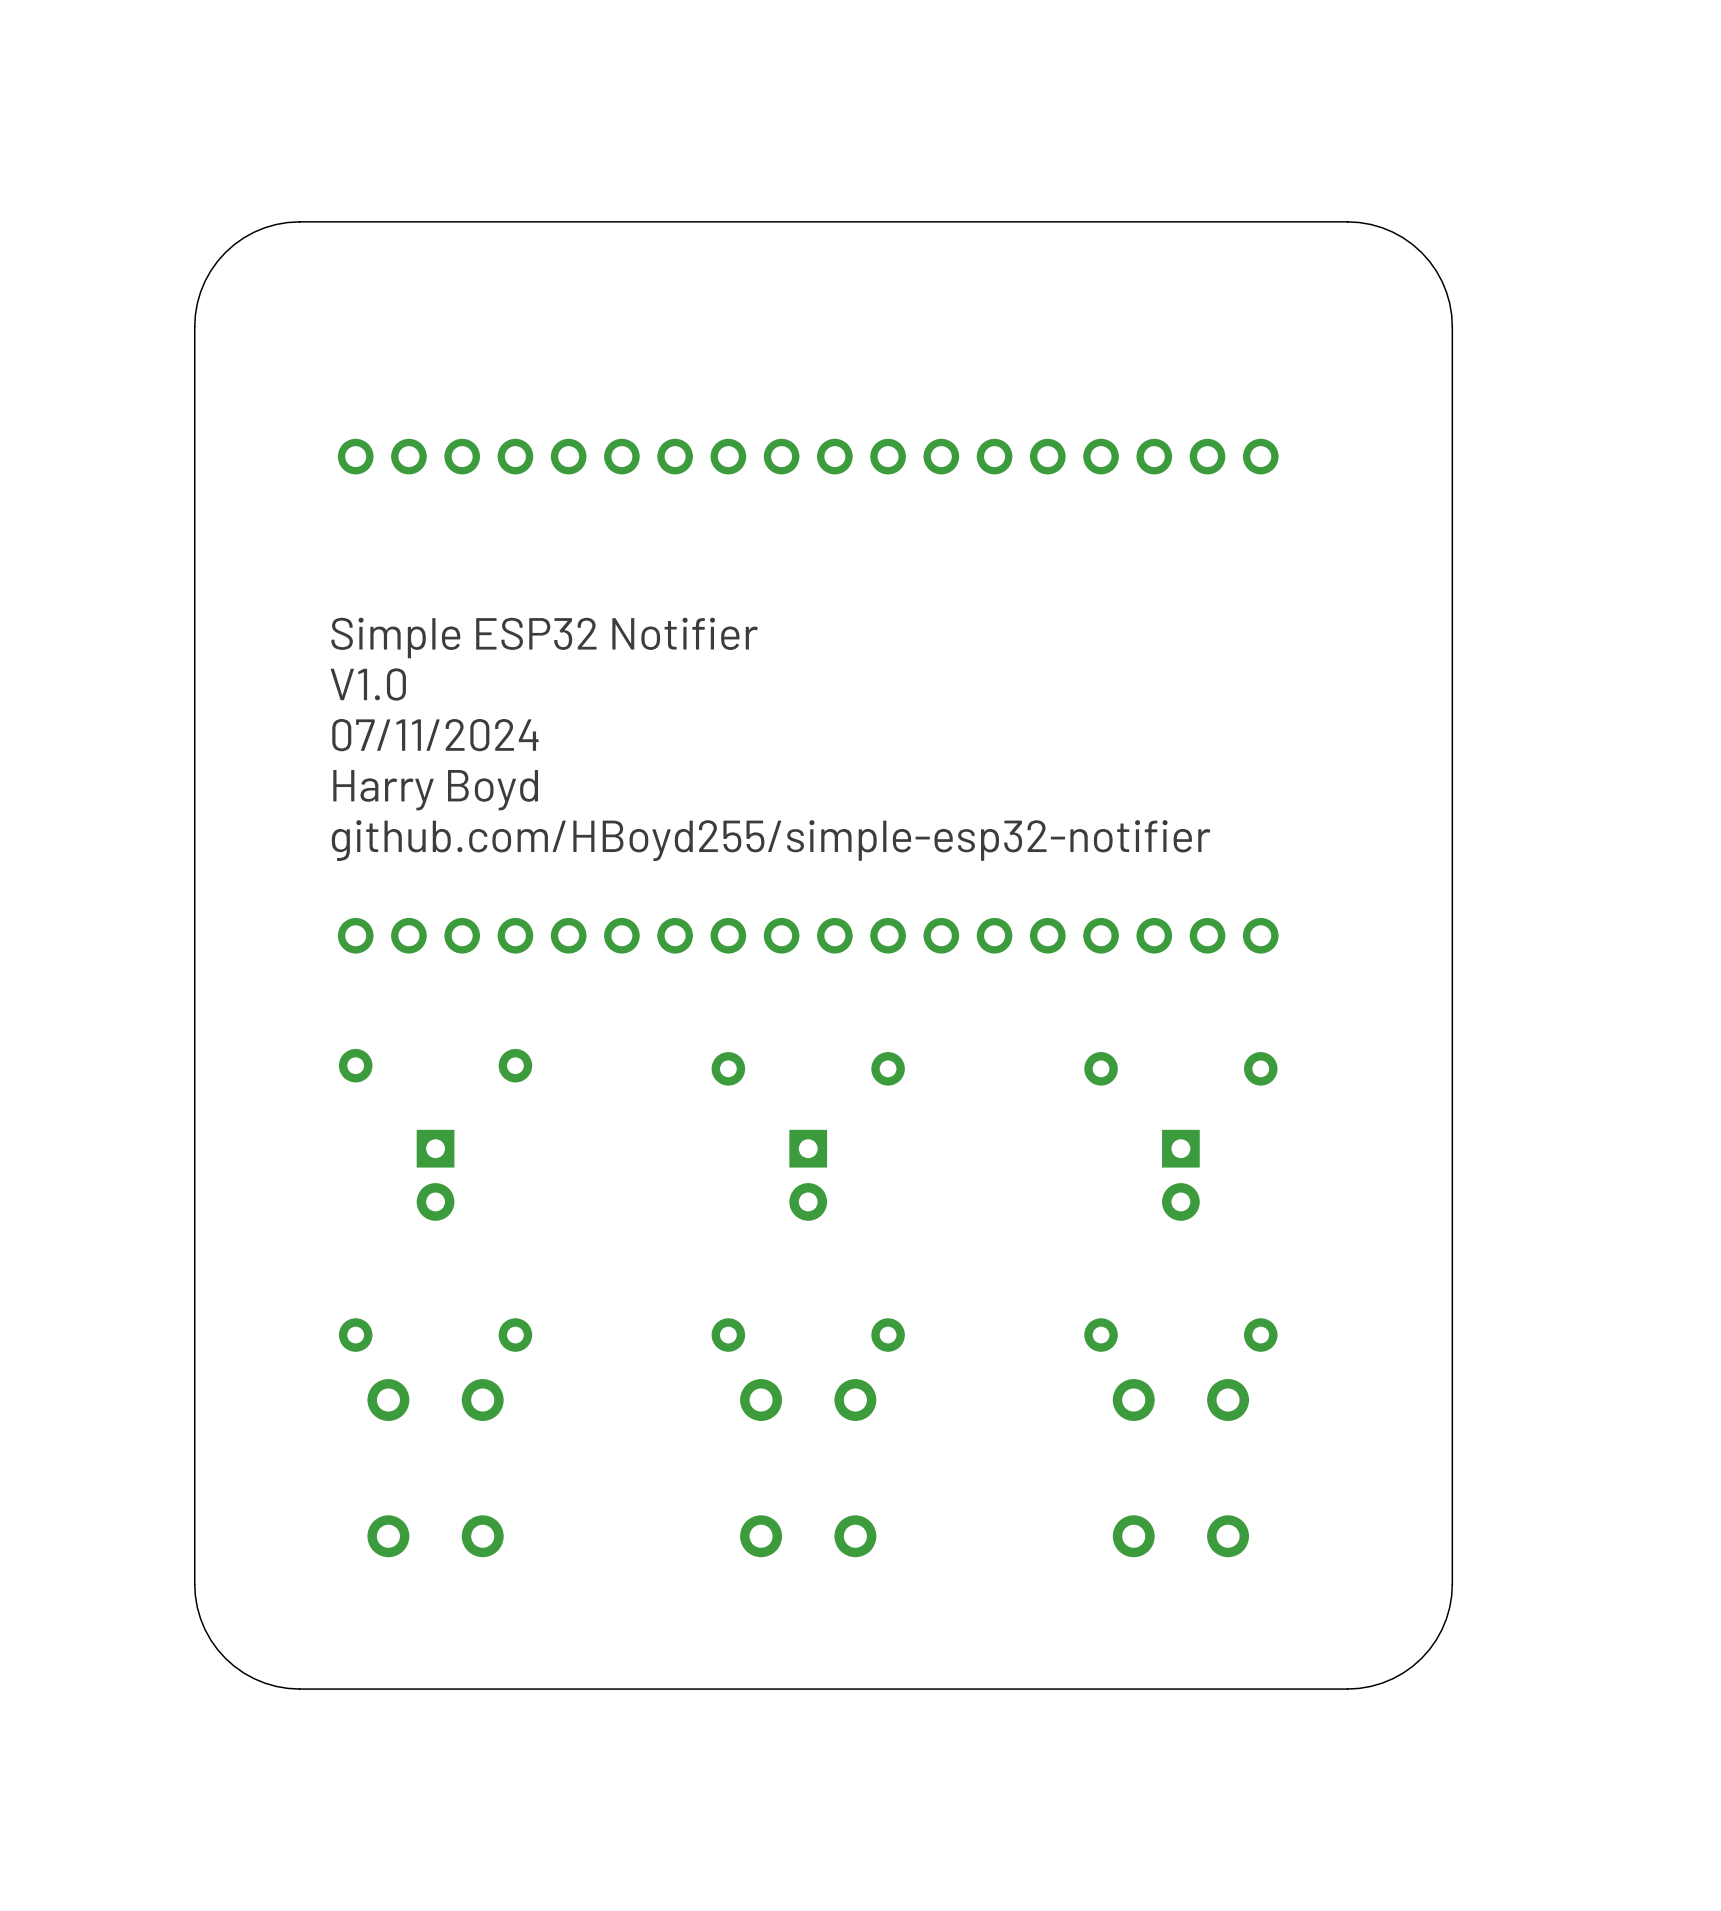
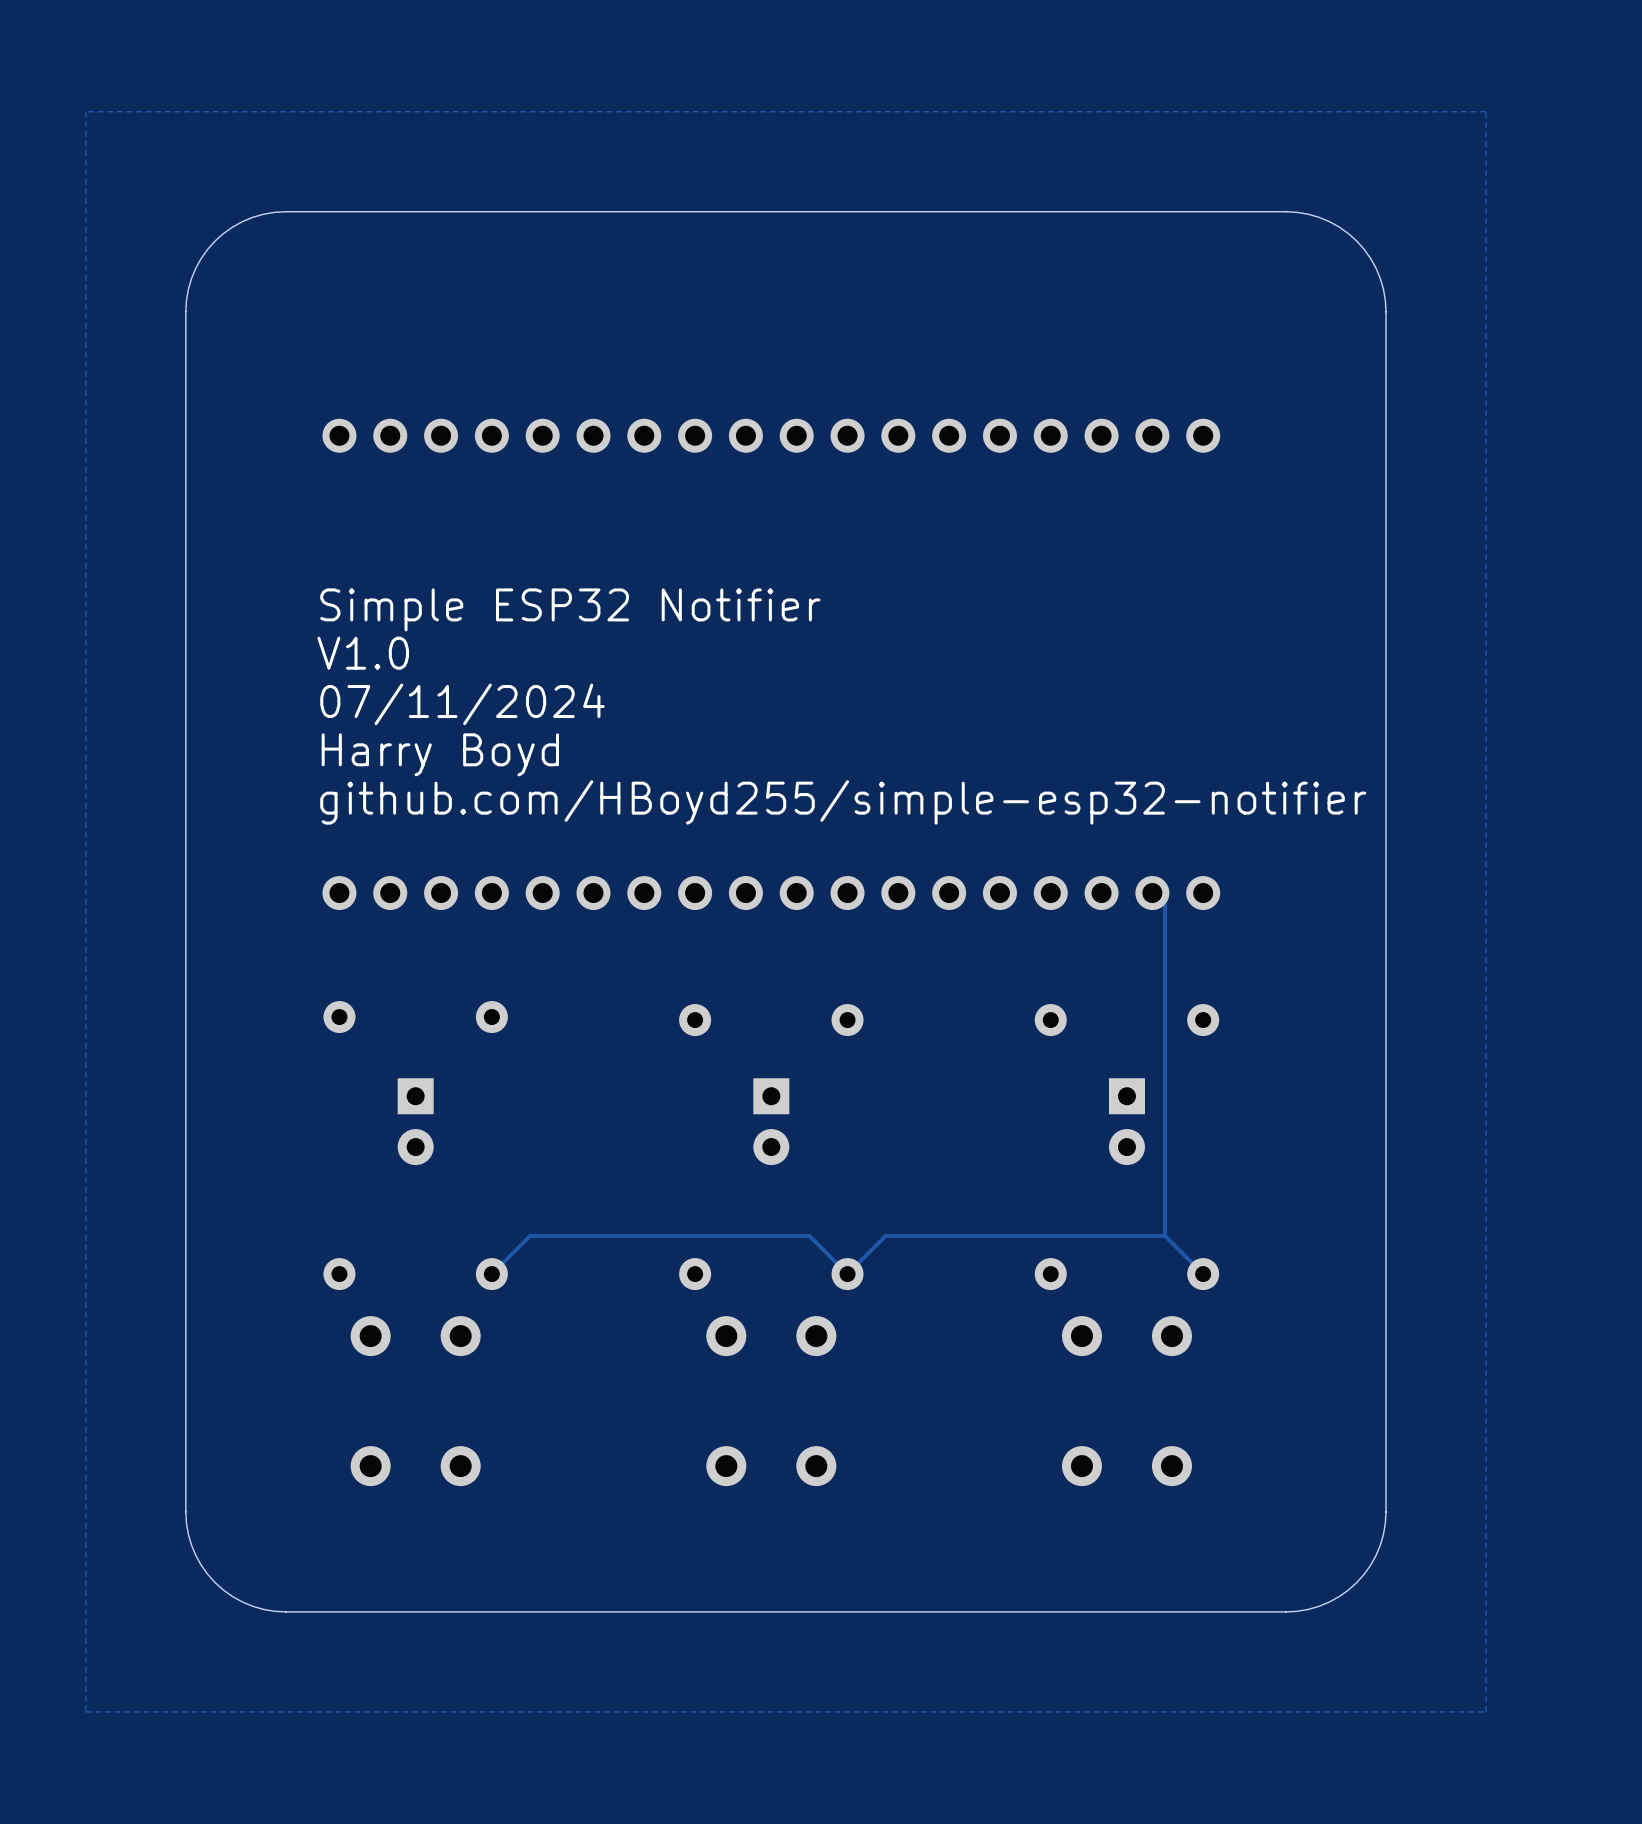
zone outline: none -> (1486, 111) (85, 111) (85, 1711) (1486, 1711) (1486, 111)
track: none -> (1152, 893) (1165, 905) (1165, 1235)
track: none -> (1165, 1235) (885, 1235) (847, 1274) (809, 1235) (529, 1235) (491, 1274)
track: none -> (1165, 1235) (1203, 1274)

